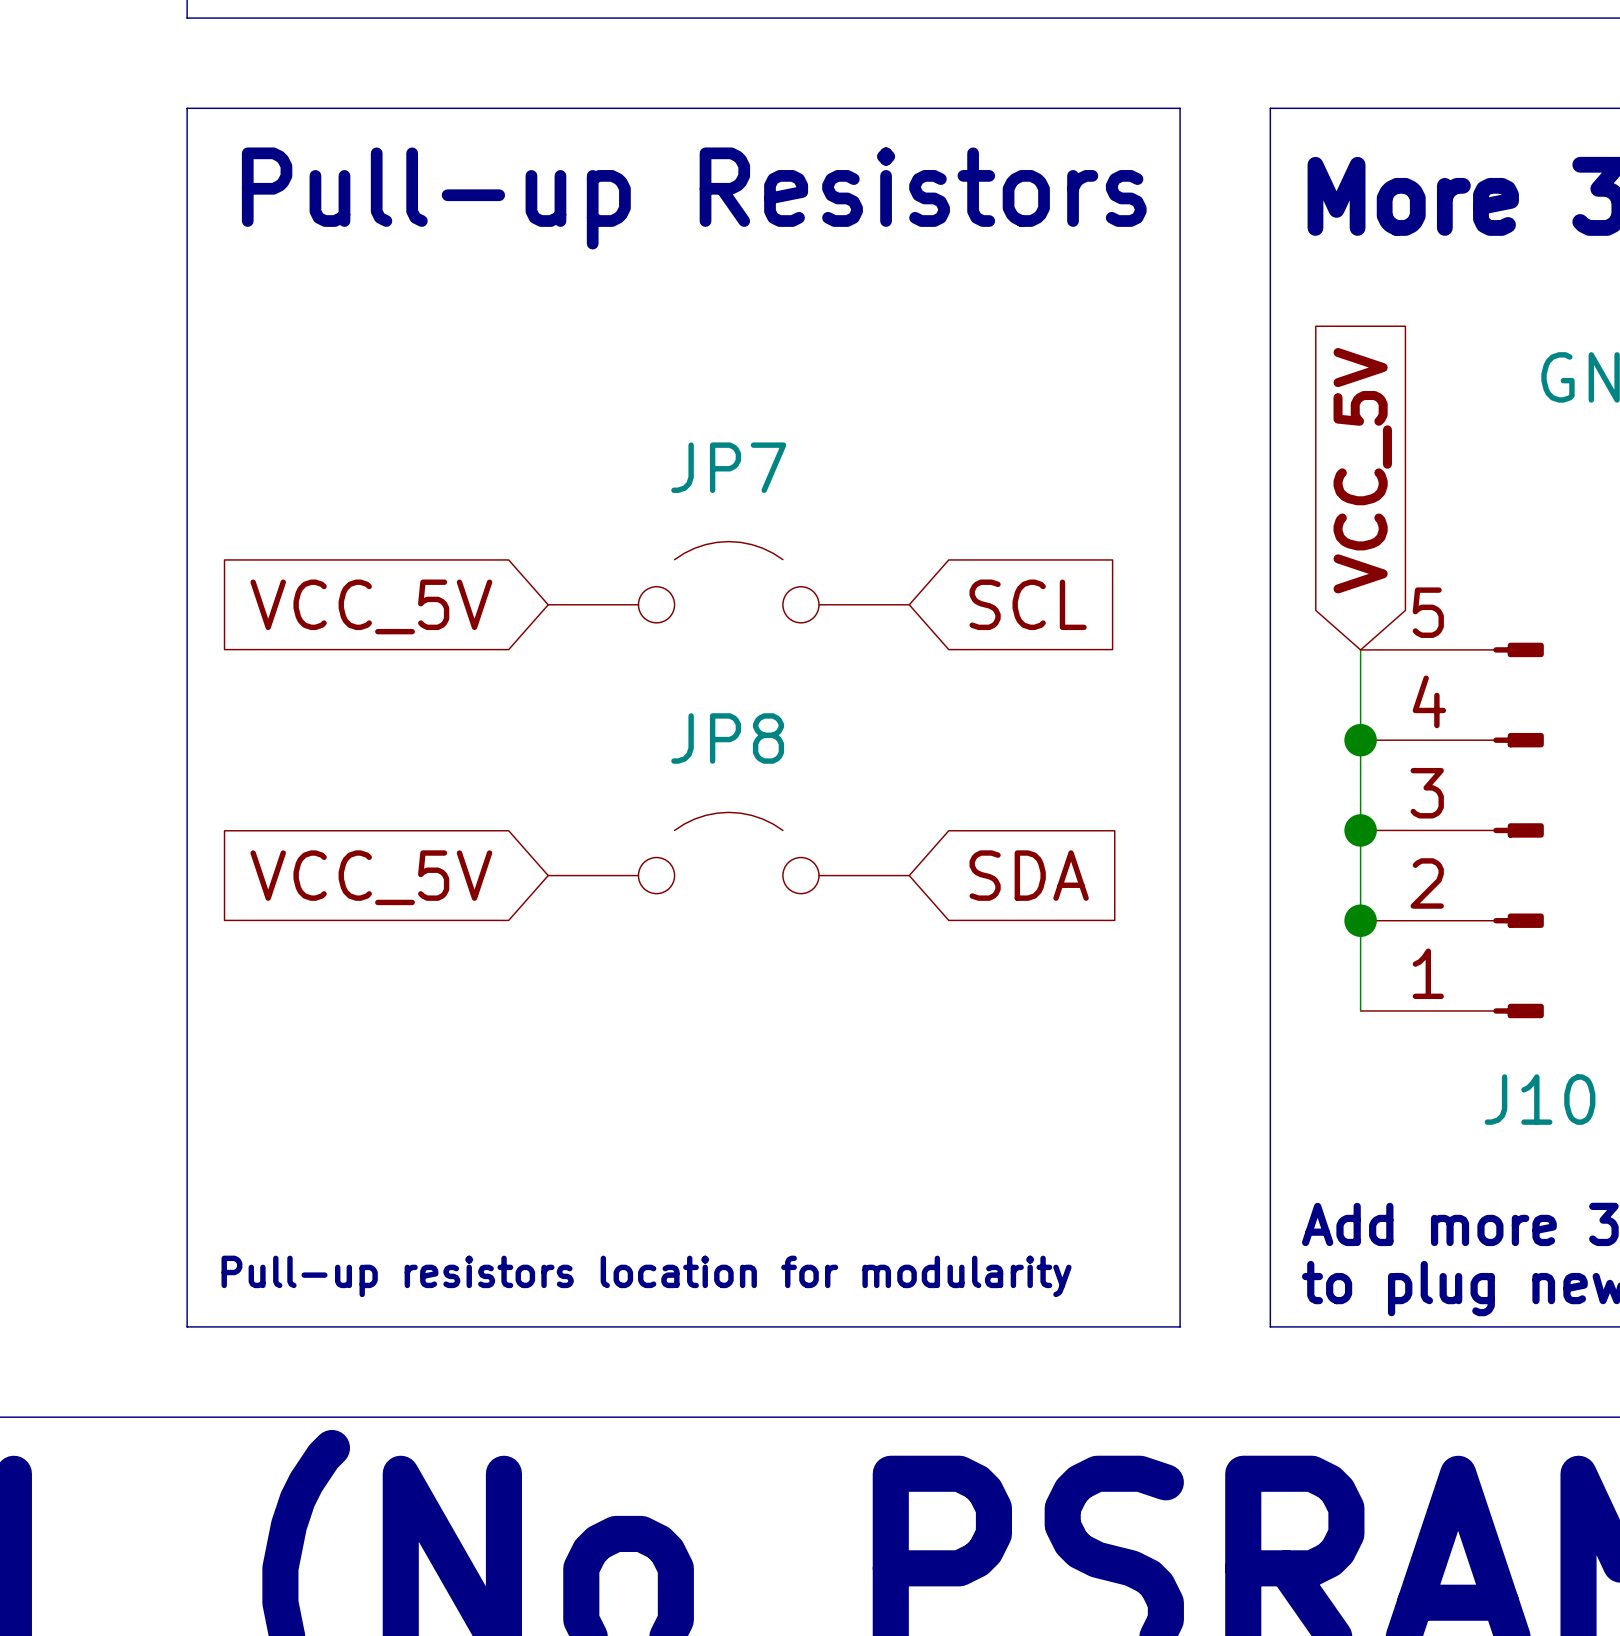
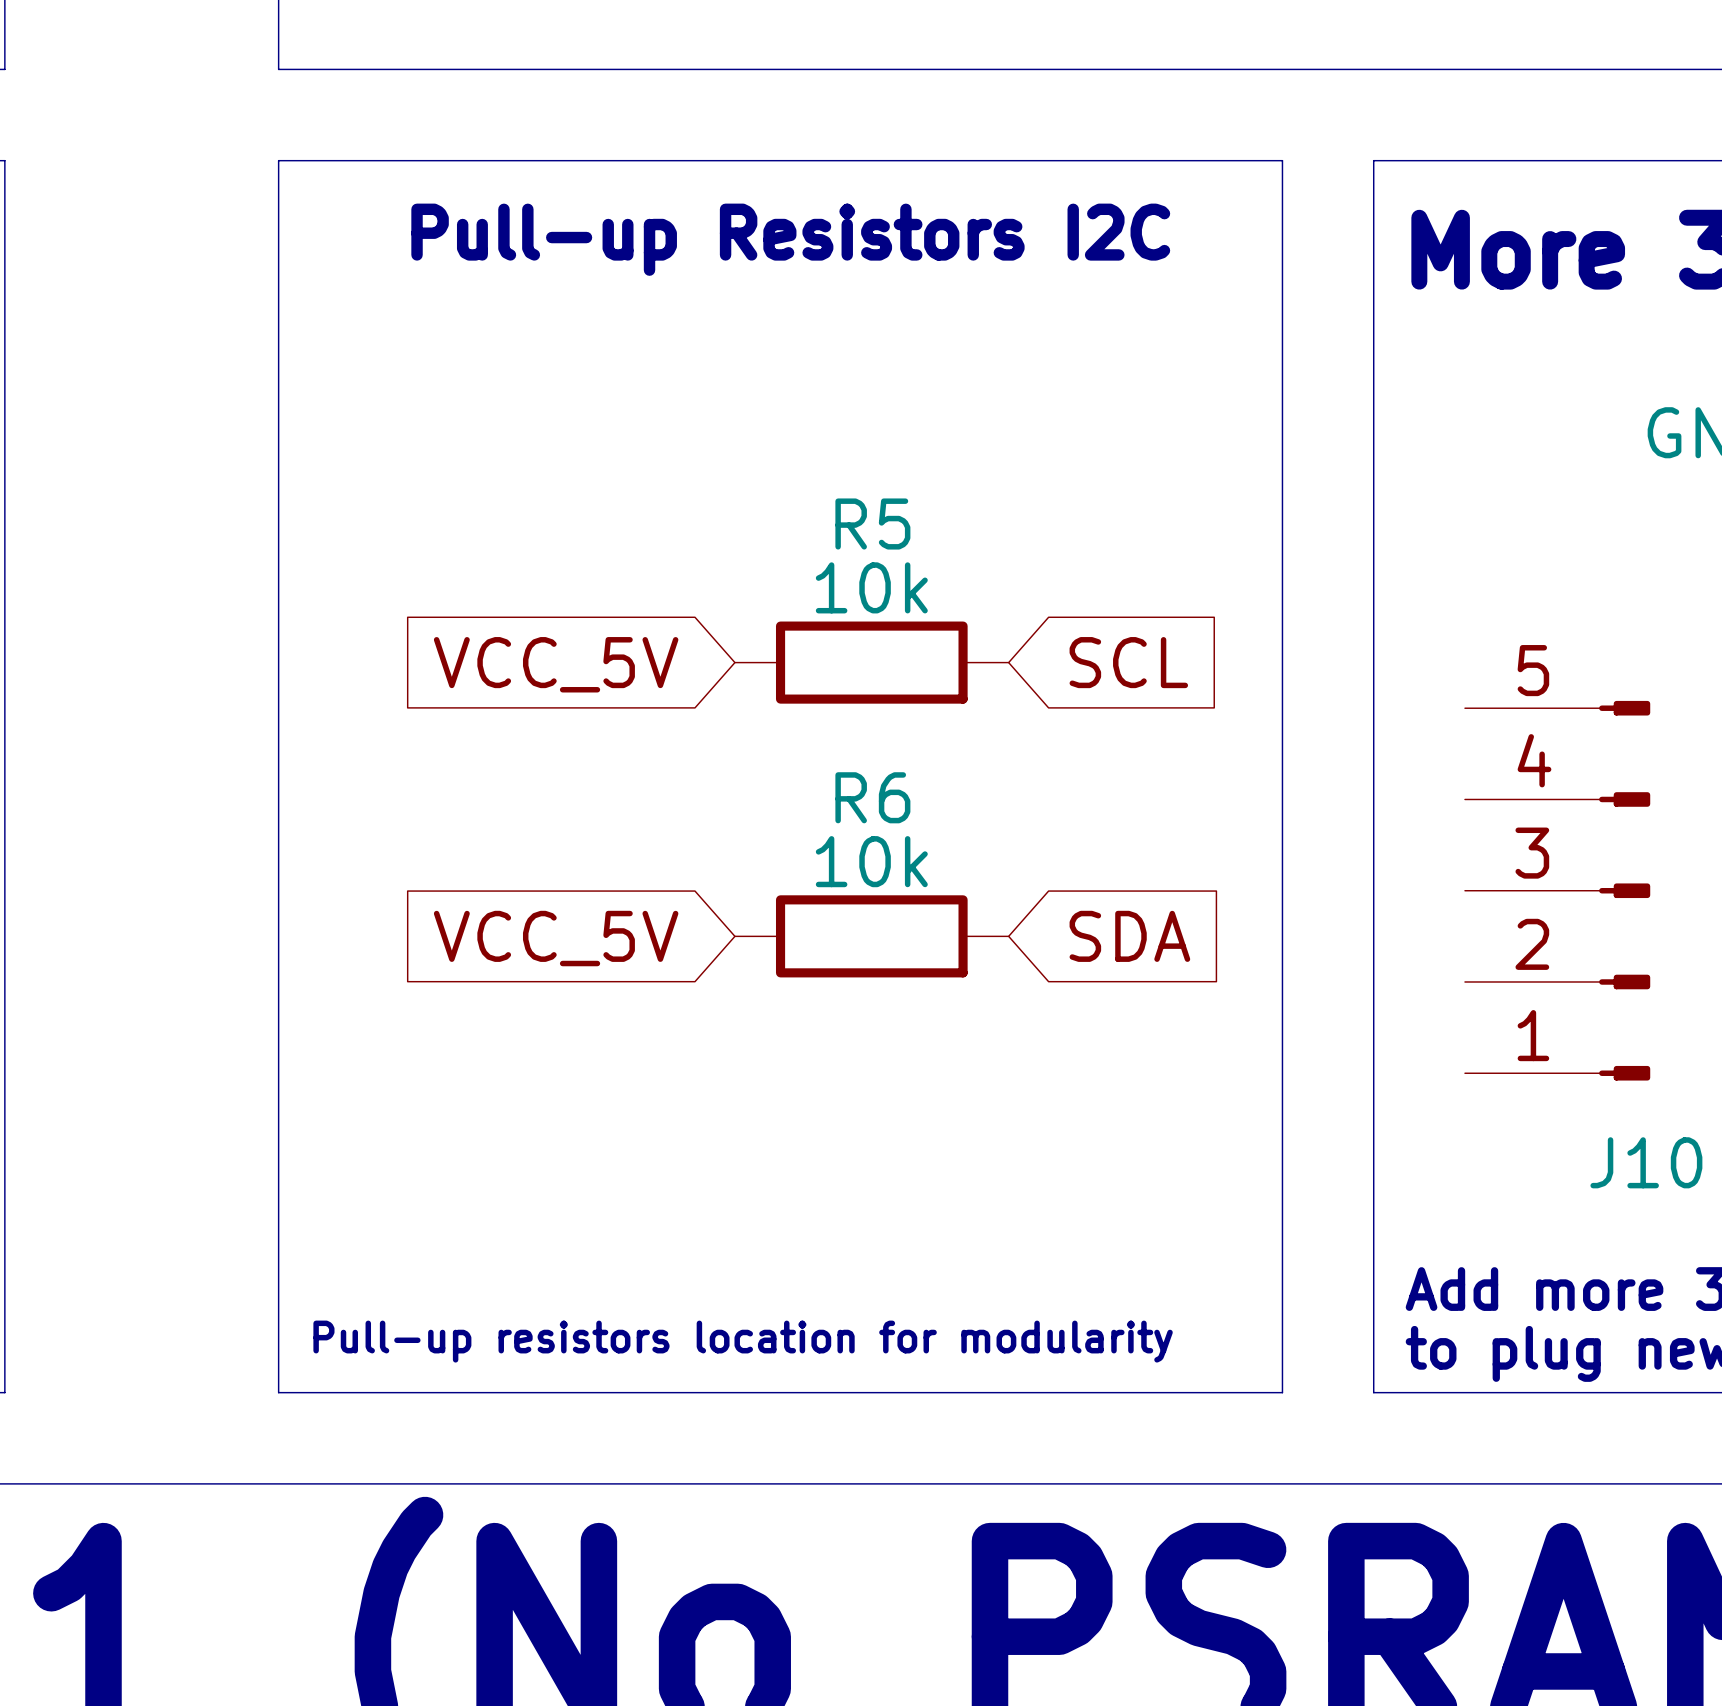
text: Pull-up Resistors (694, 198) -> Pull-up Resistors I2C (790, 239)
global label: VCC_5V (1362, 470) -> none
JP7: (728, 582) -> none
R5: none -> 10k (871, 662)
global label position: VCC_5V (371, 606) -> VCC_5V (556, 664)
wire: (1360, 649) (1360, 1010) -> none
junction: (1360, 740) -> none
junction: (1360, 830) -> none
JP8: (728, 853) -> none
R6: none -> 10k (871, 936)
global label position: VCC_5V (371, 877) -> VCC_5V (556, 938)
junction: (1360, 920) -> none

